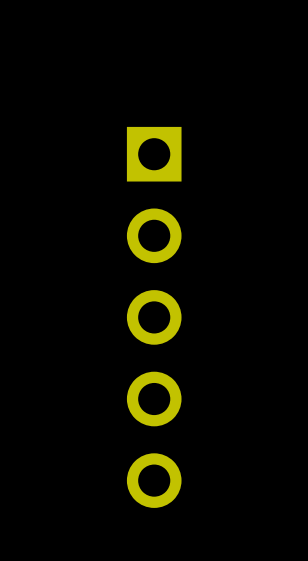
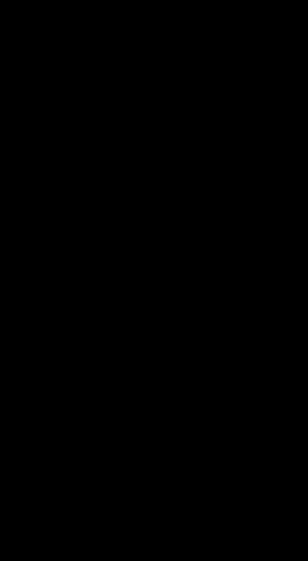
part: (154, 317) -> none

